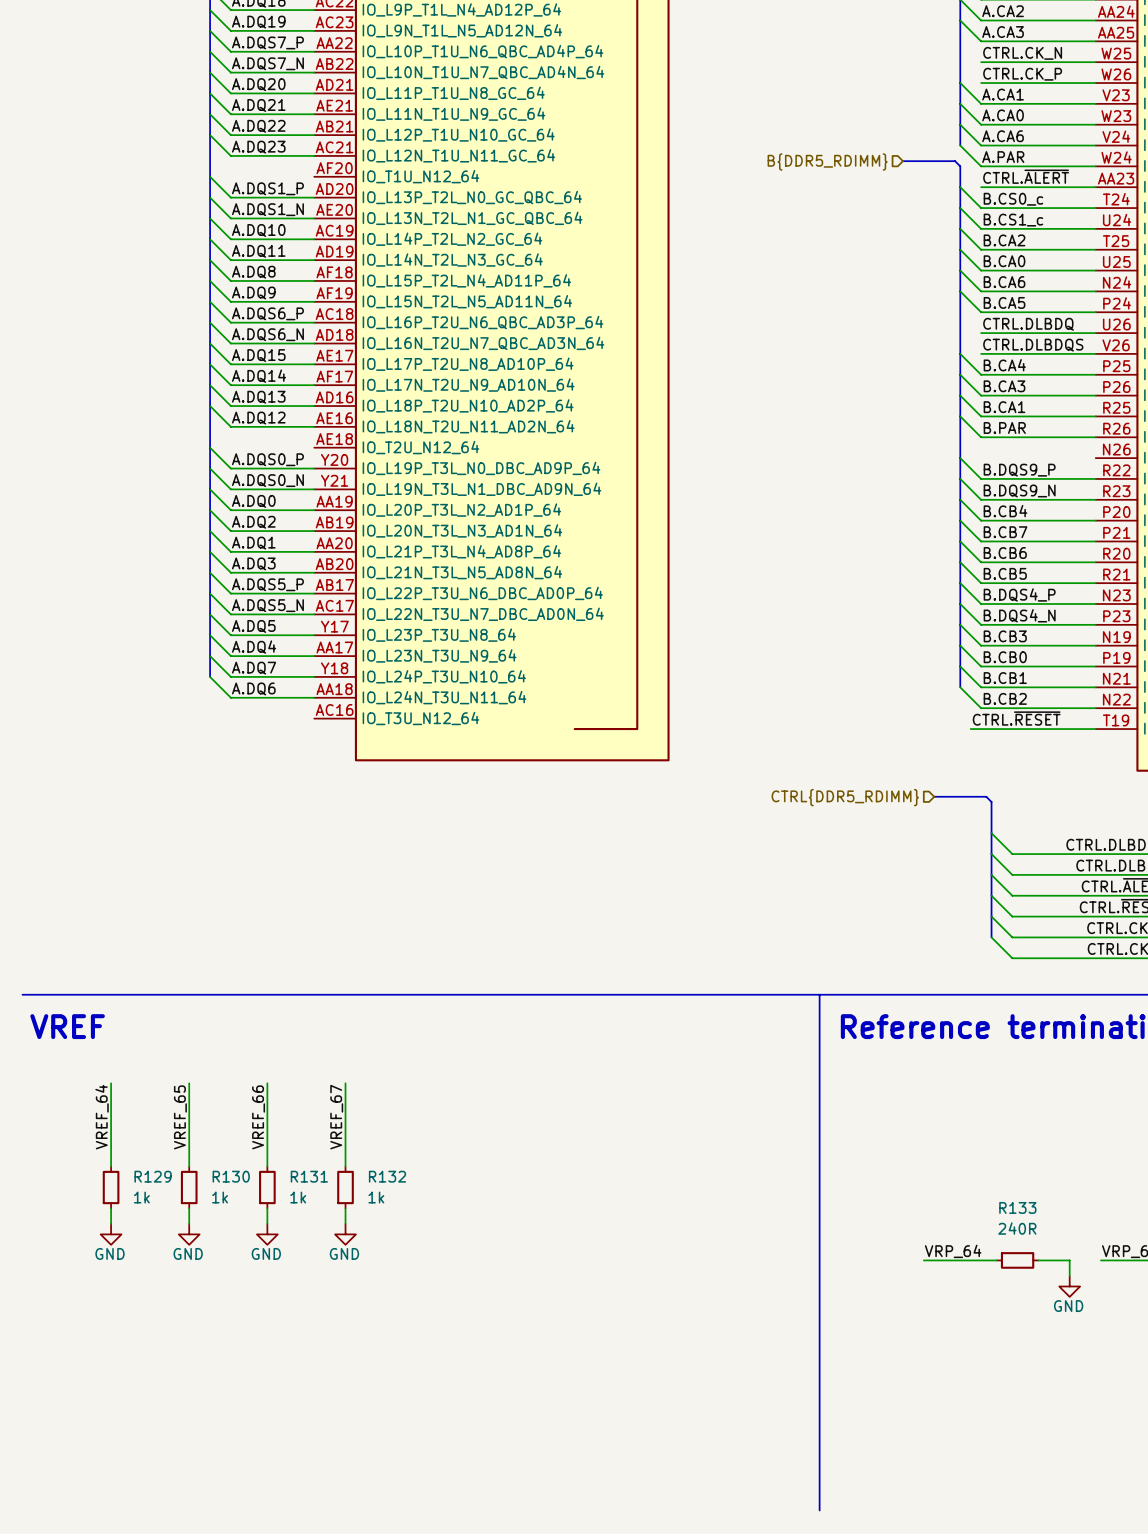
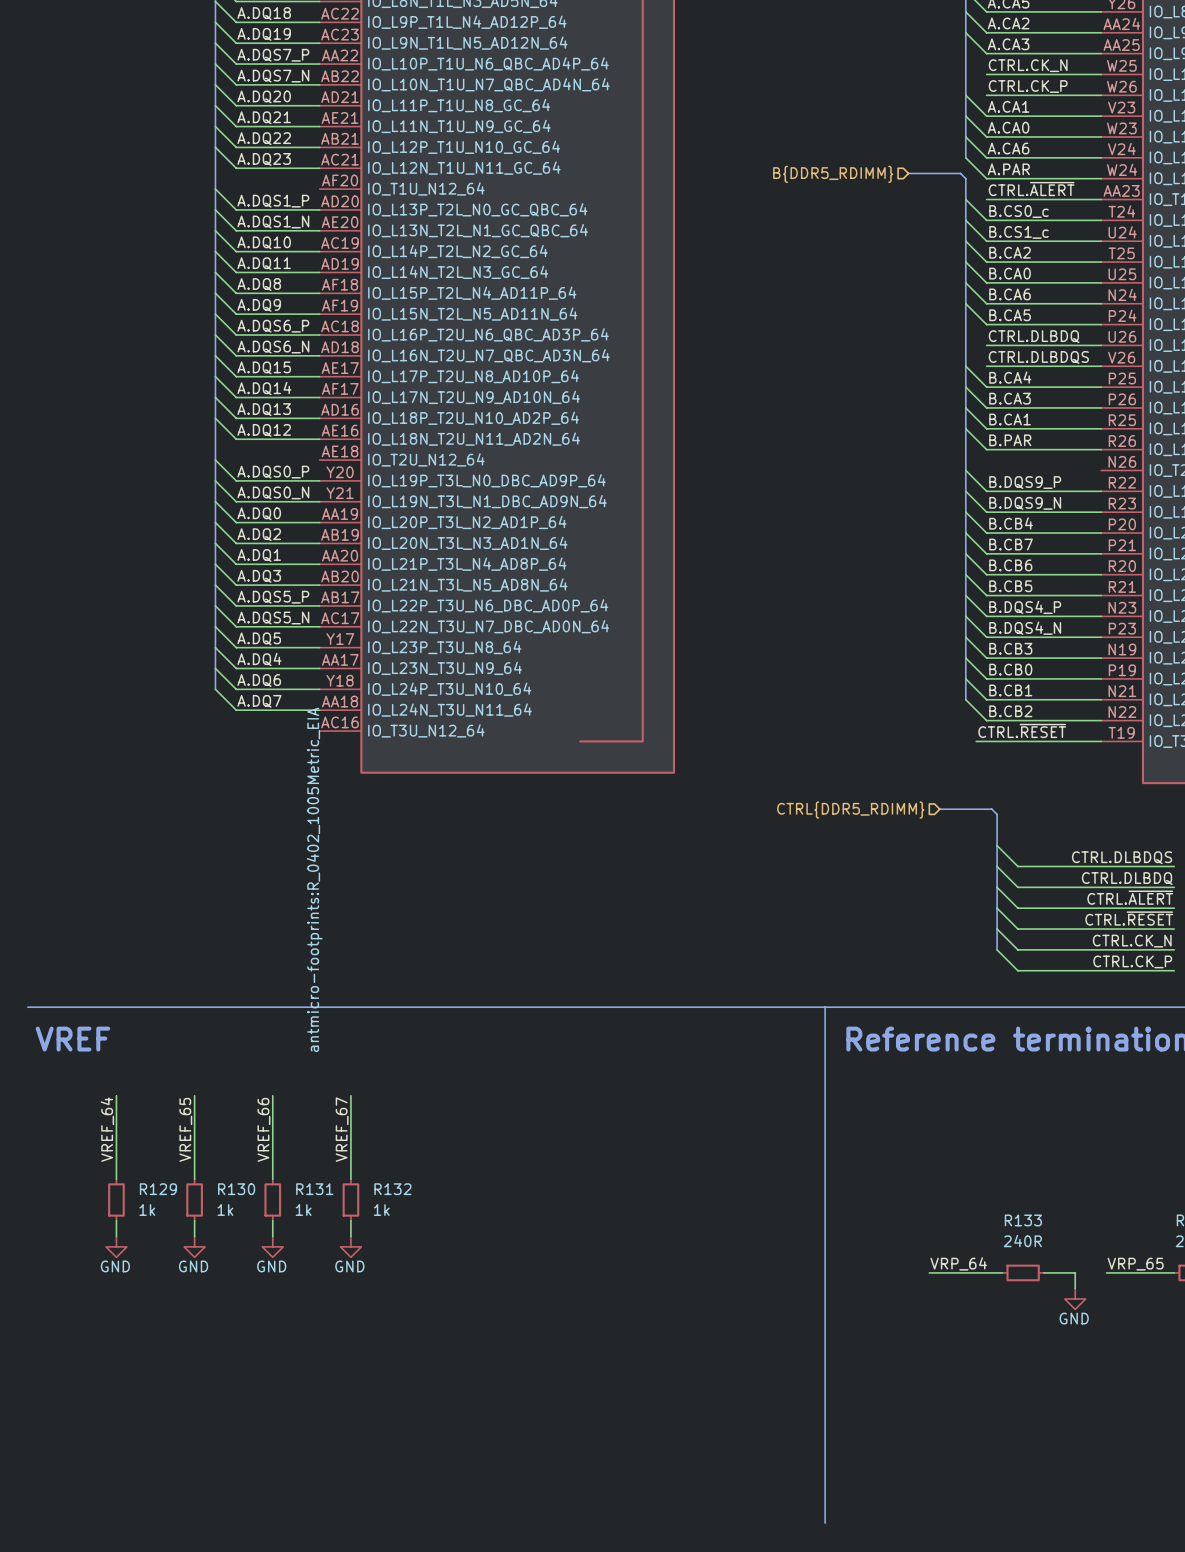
label: A.DQ7 (254, 668) -> A.DQ6 (259, 680)
label: A.DQ6 (253, 688) -> A.DQ7 (259, 701)
R130 text: none -> antmicro-footprints:R_0402_1005Metric_EIA (314, 879)

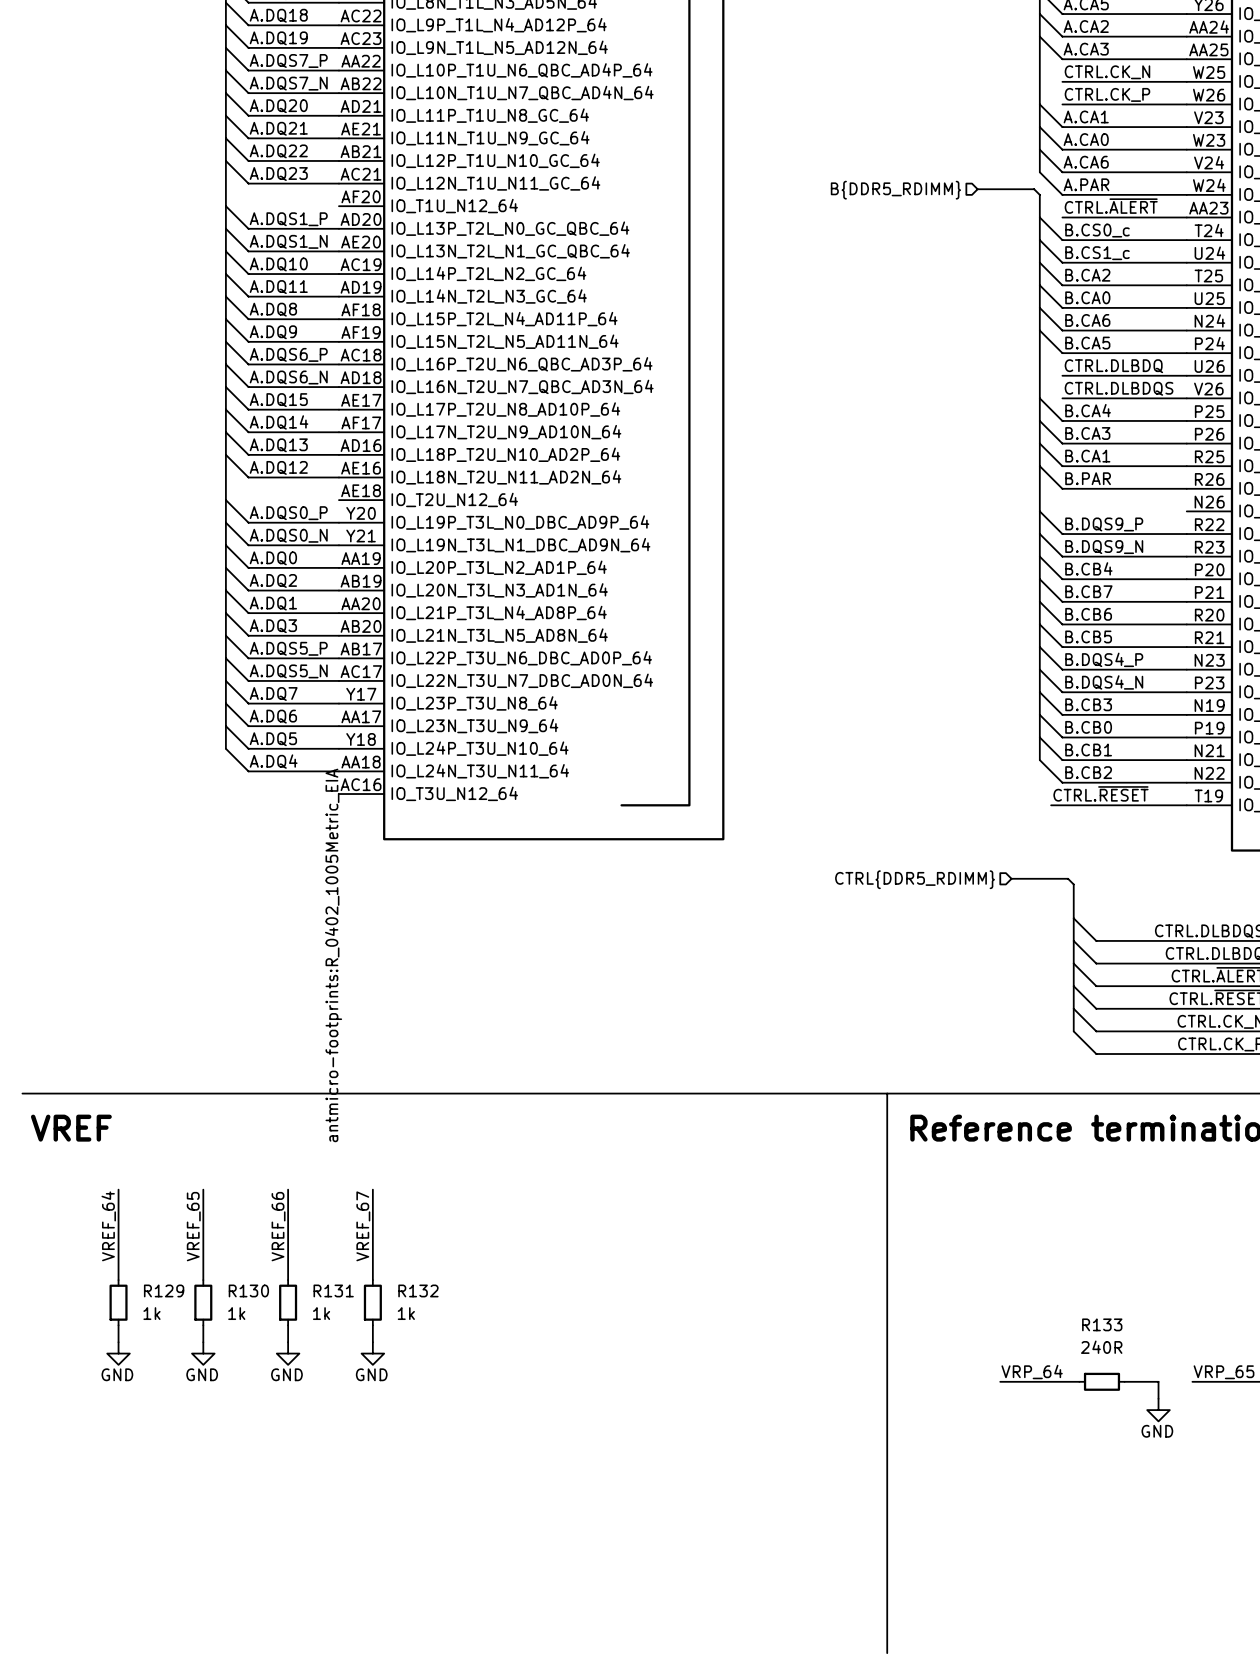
label: A.DQ5 (259, 638) -> A.DQ7 (273, 694)
label: A.DQ4 (259, 659) -> A.DQ6 (273, 716)
label: A.DQ6 (259, 680) -> A.DQ5 (273, 739)
label: A.DQ7 (259, 701) -> A.DQ4 (273, 761)

